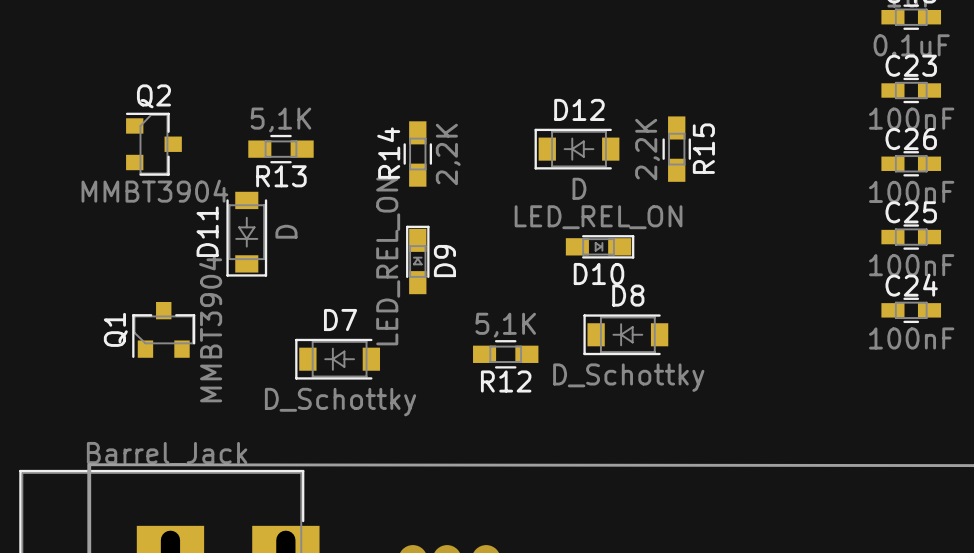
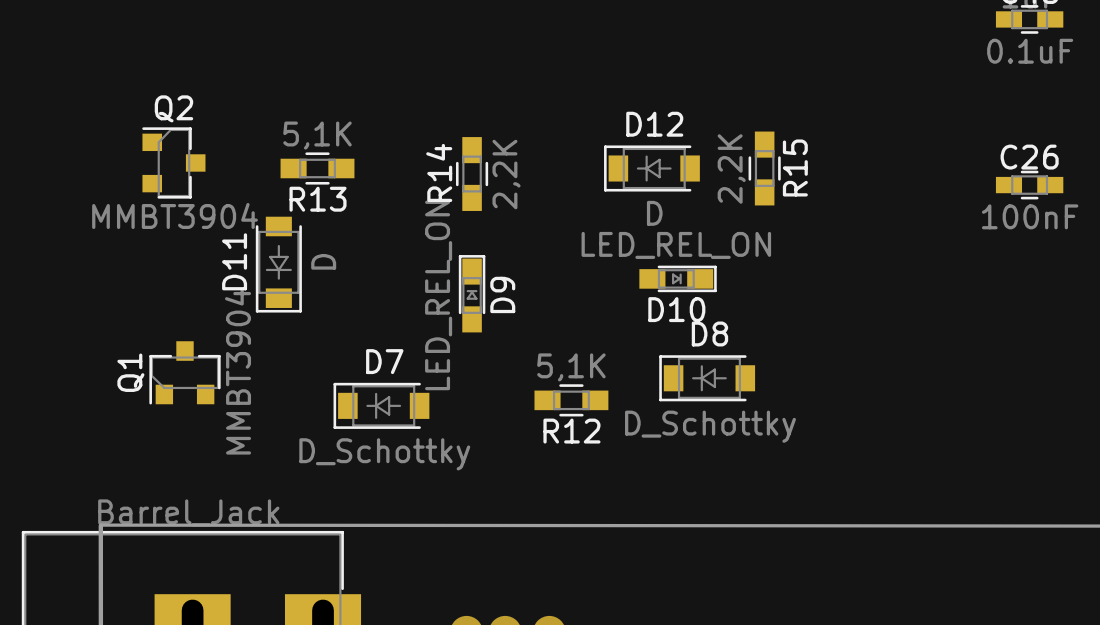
C23: 100nF (911, 90) -> none
C25: 100nF (911, 237) -> none
C24: 100nF (911, 310) -> none

